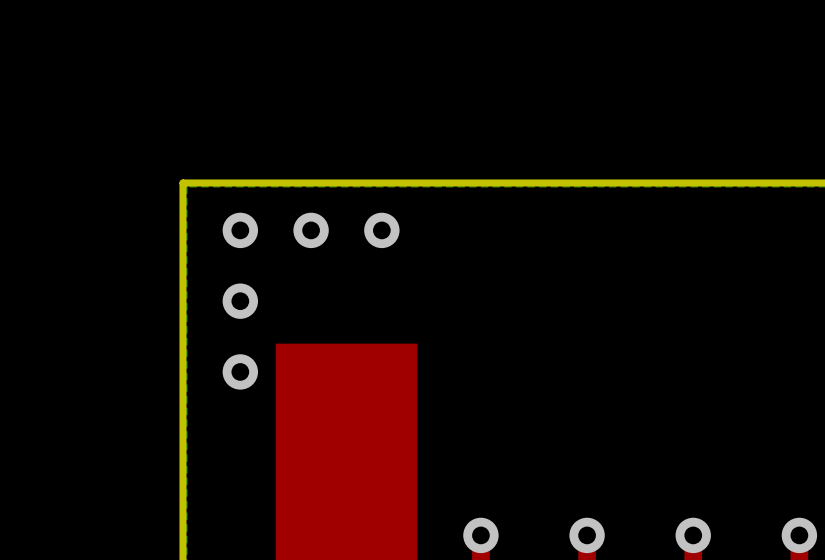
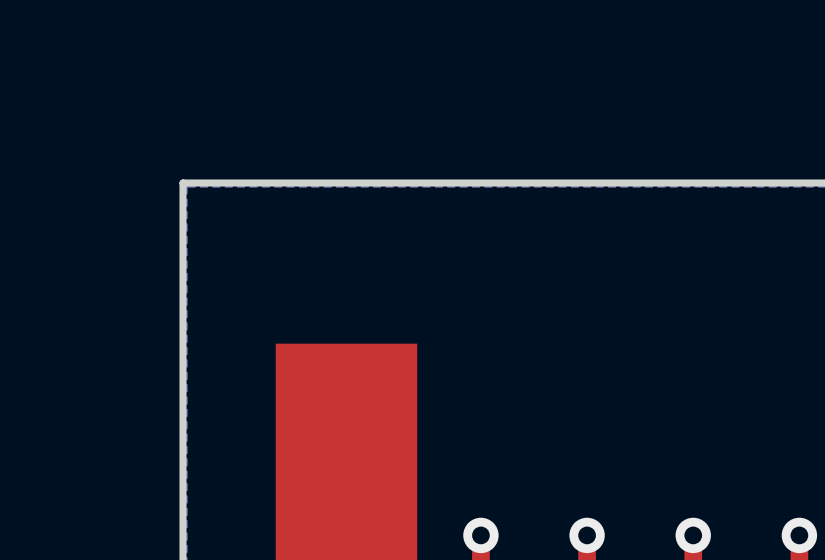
via: (240, 230) -> none
via: (311, 230) -> none
via: (381, 230) -> none
via: (240, 301) -> none
via: (240, 371) -> none

